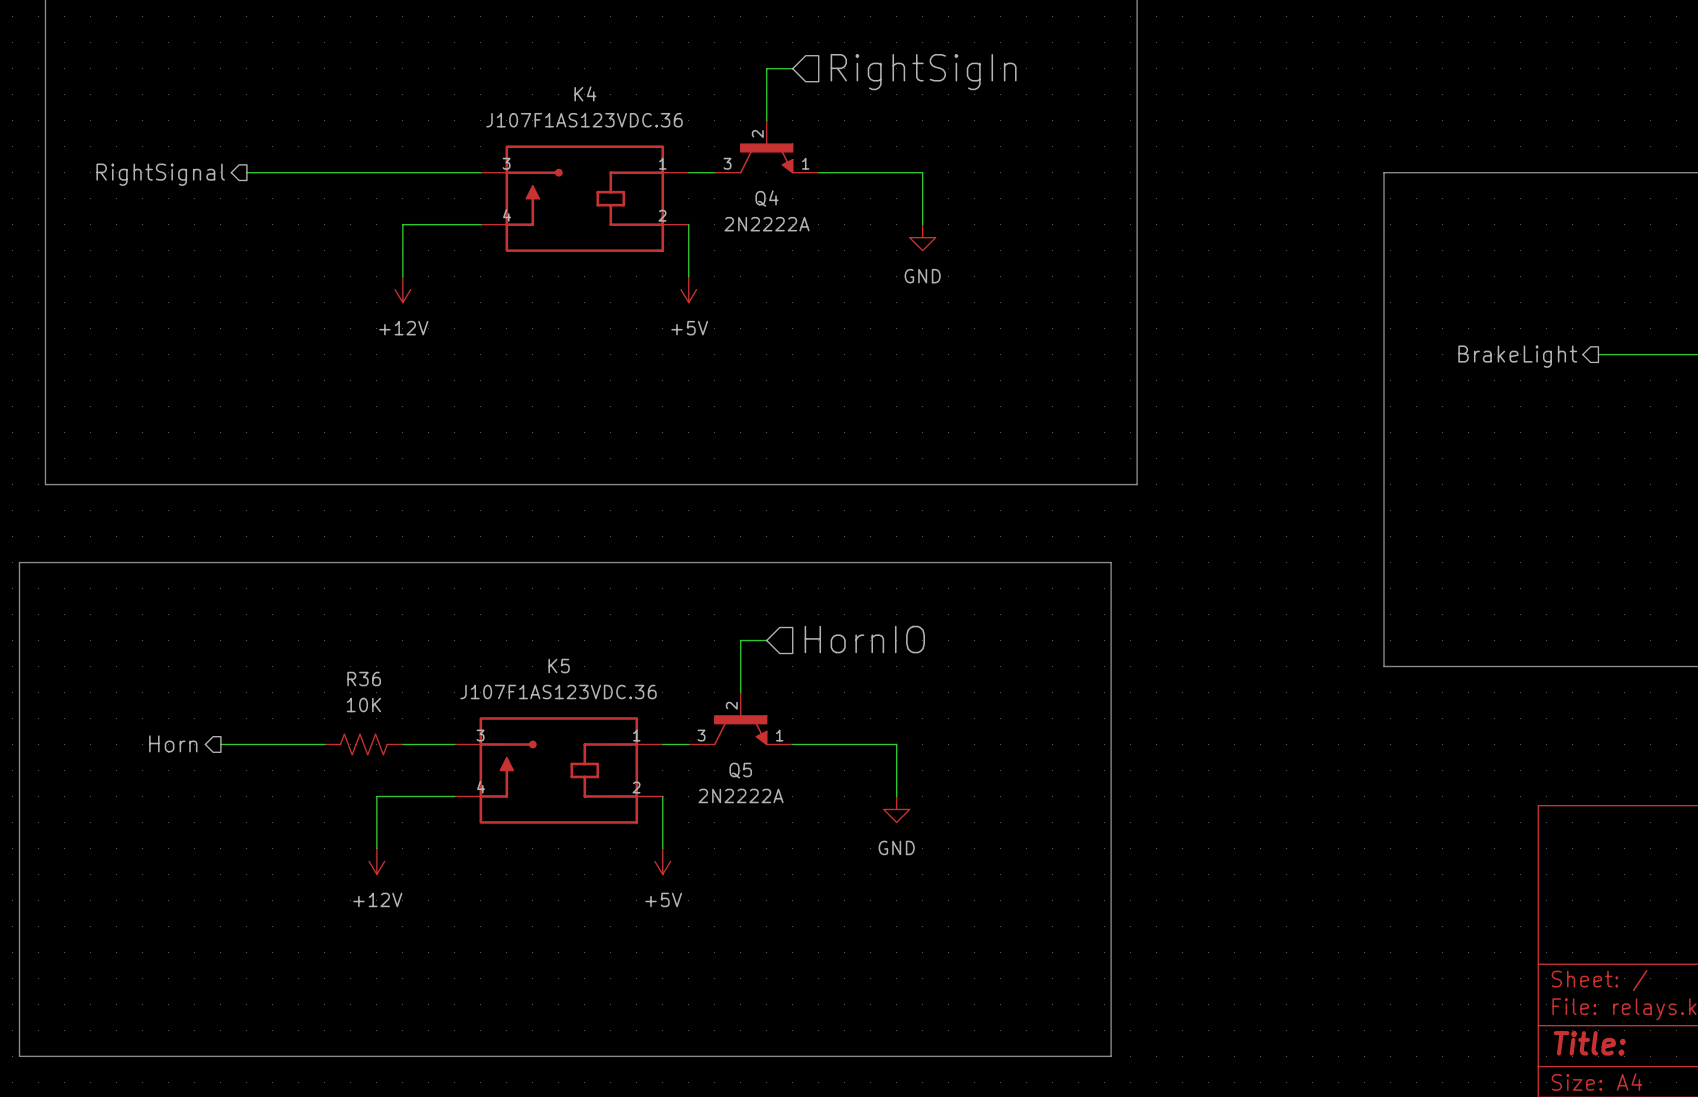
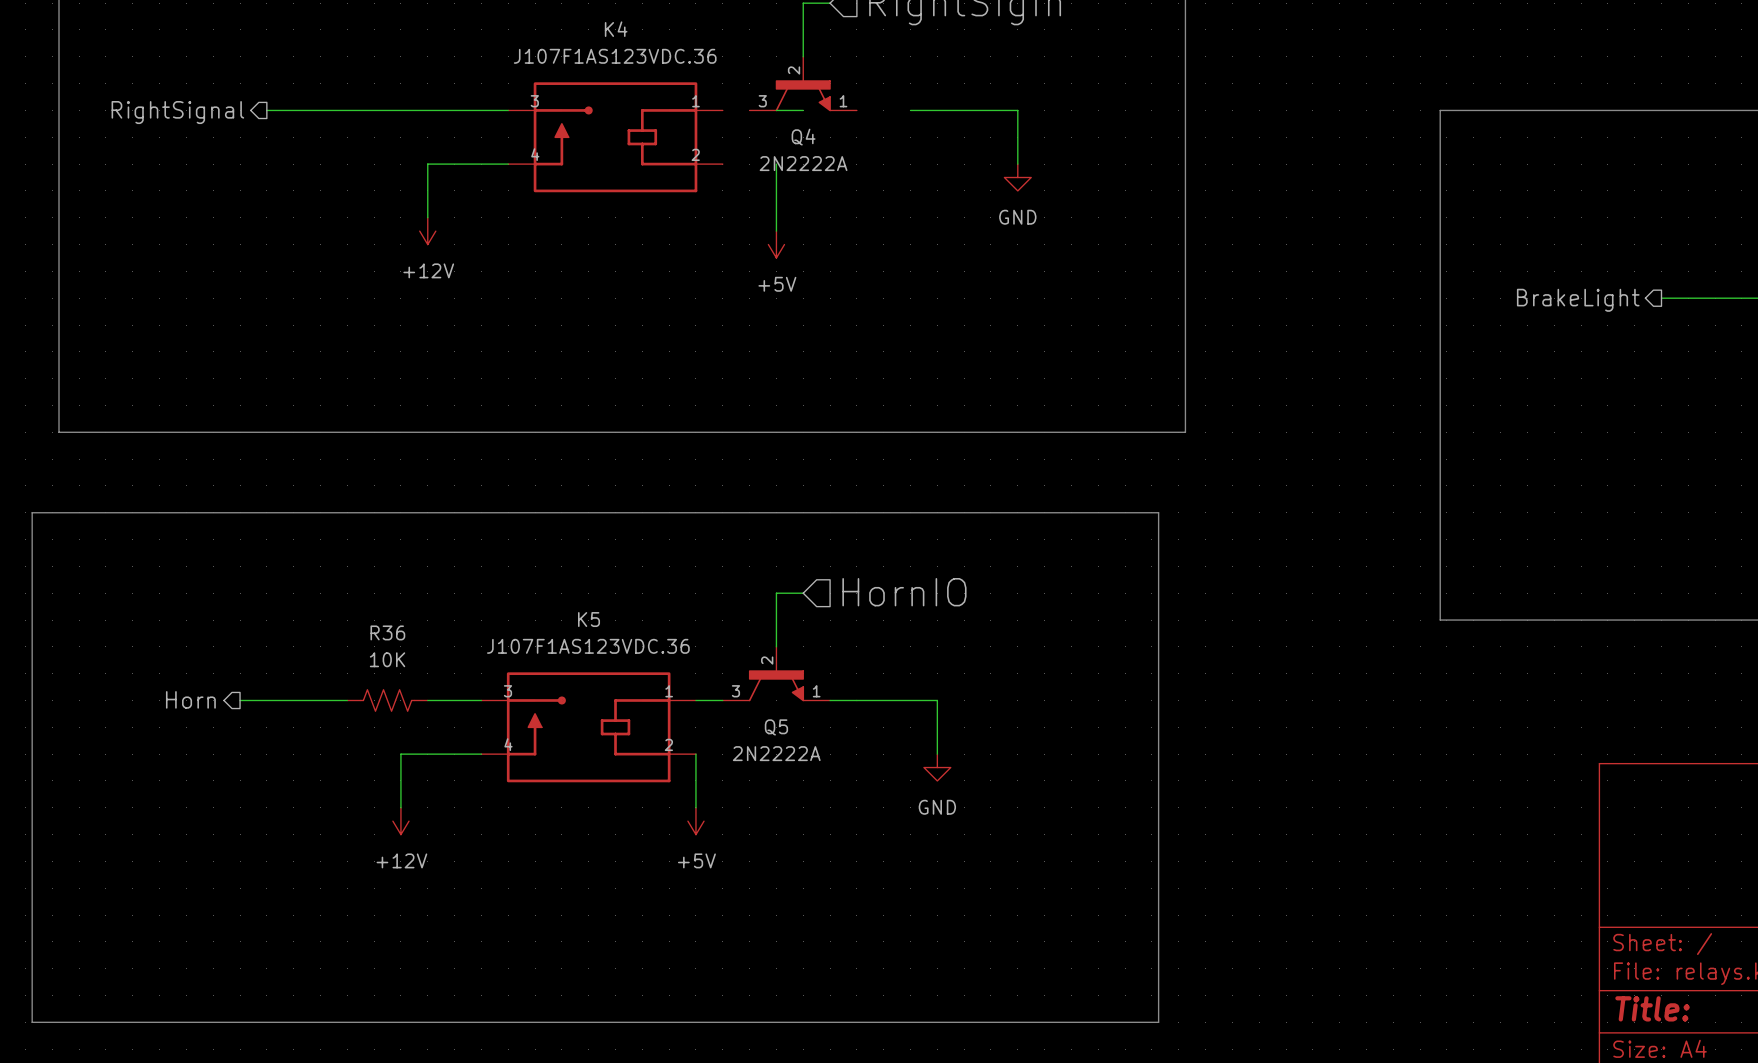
wire: (688, 172) (714, 172) -> (776, 110) (803, 110)
wire: (818, 172) (870, 172) -> none
wire: (922, 172) (922, 224) -> (964, 110) (1017, 110) (1017, 164)
wire: (688, 224) (688, 276) -> none
wire: none -> (776, 164) (776, 231)
power symbol position: GND (922, 237) -> GND (1017, 177)
power symbol position: +5V (688, 289) -> +5V (776, 244)

